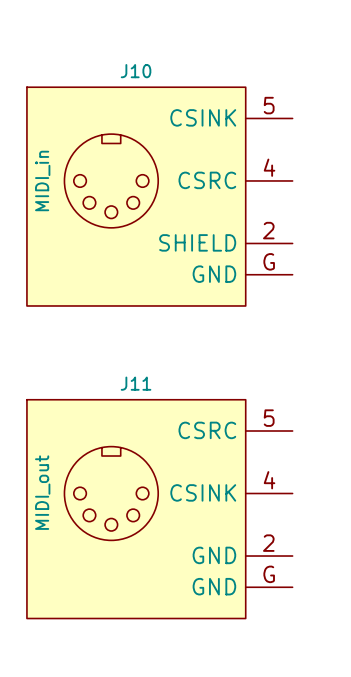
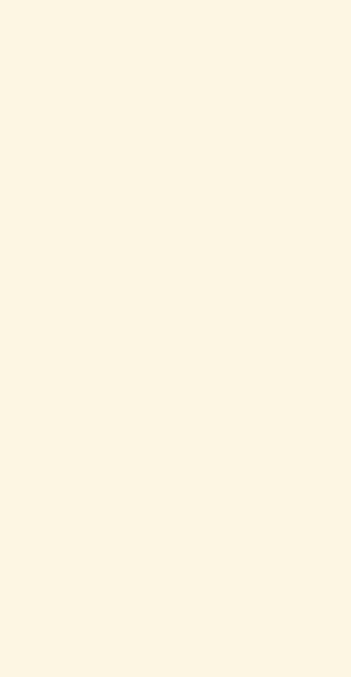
J10: MIDI_in (159, 196) -> none
J11: MIDI_out (159, 509) -> none

